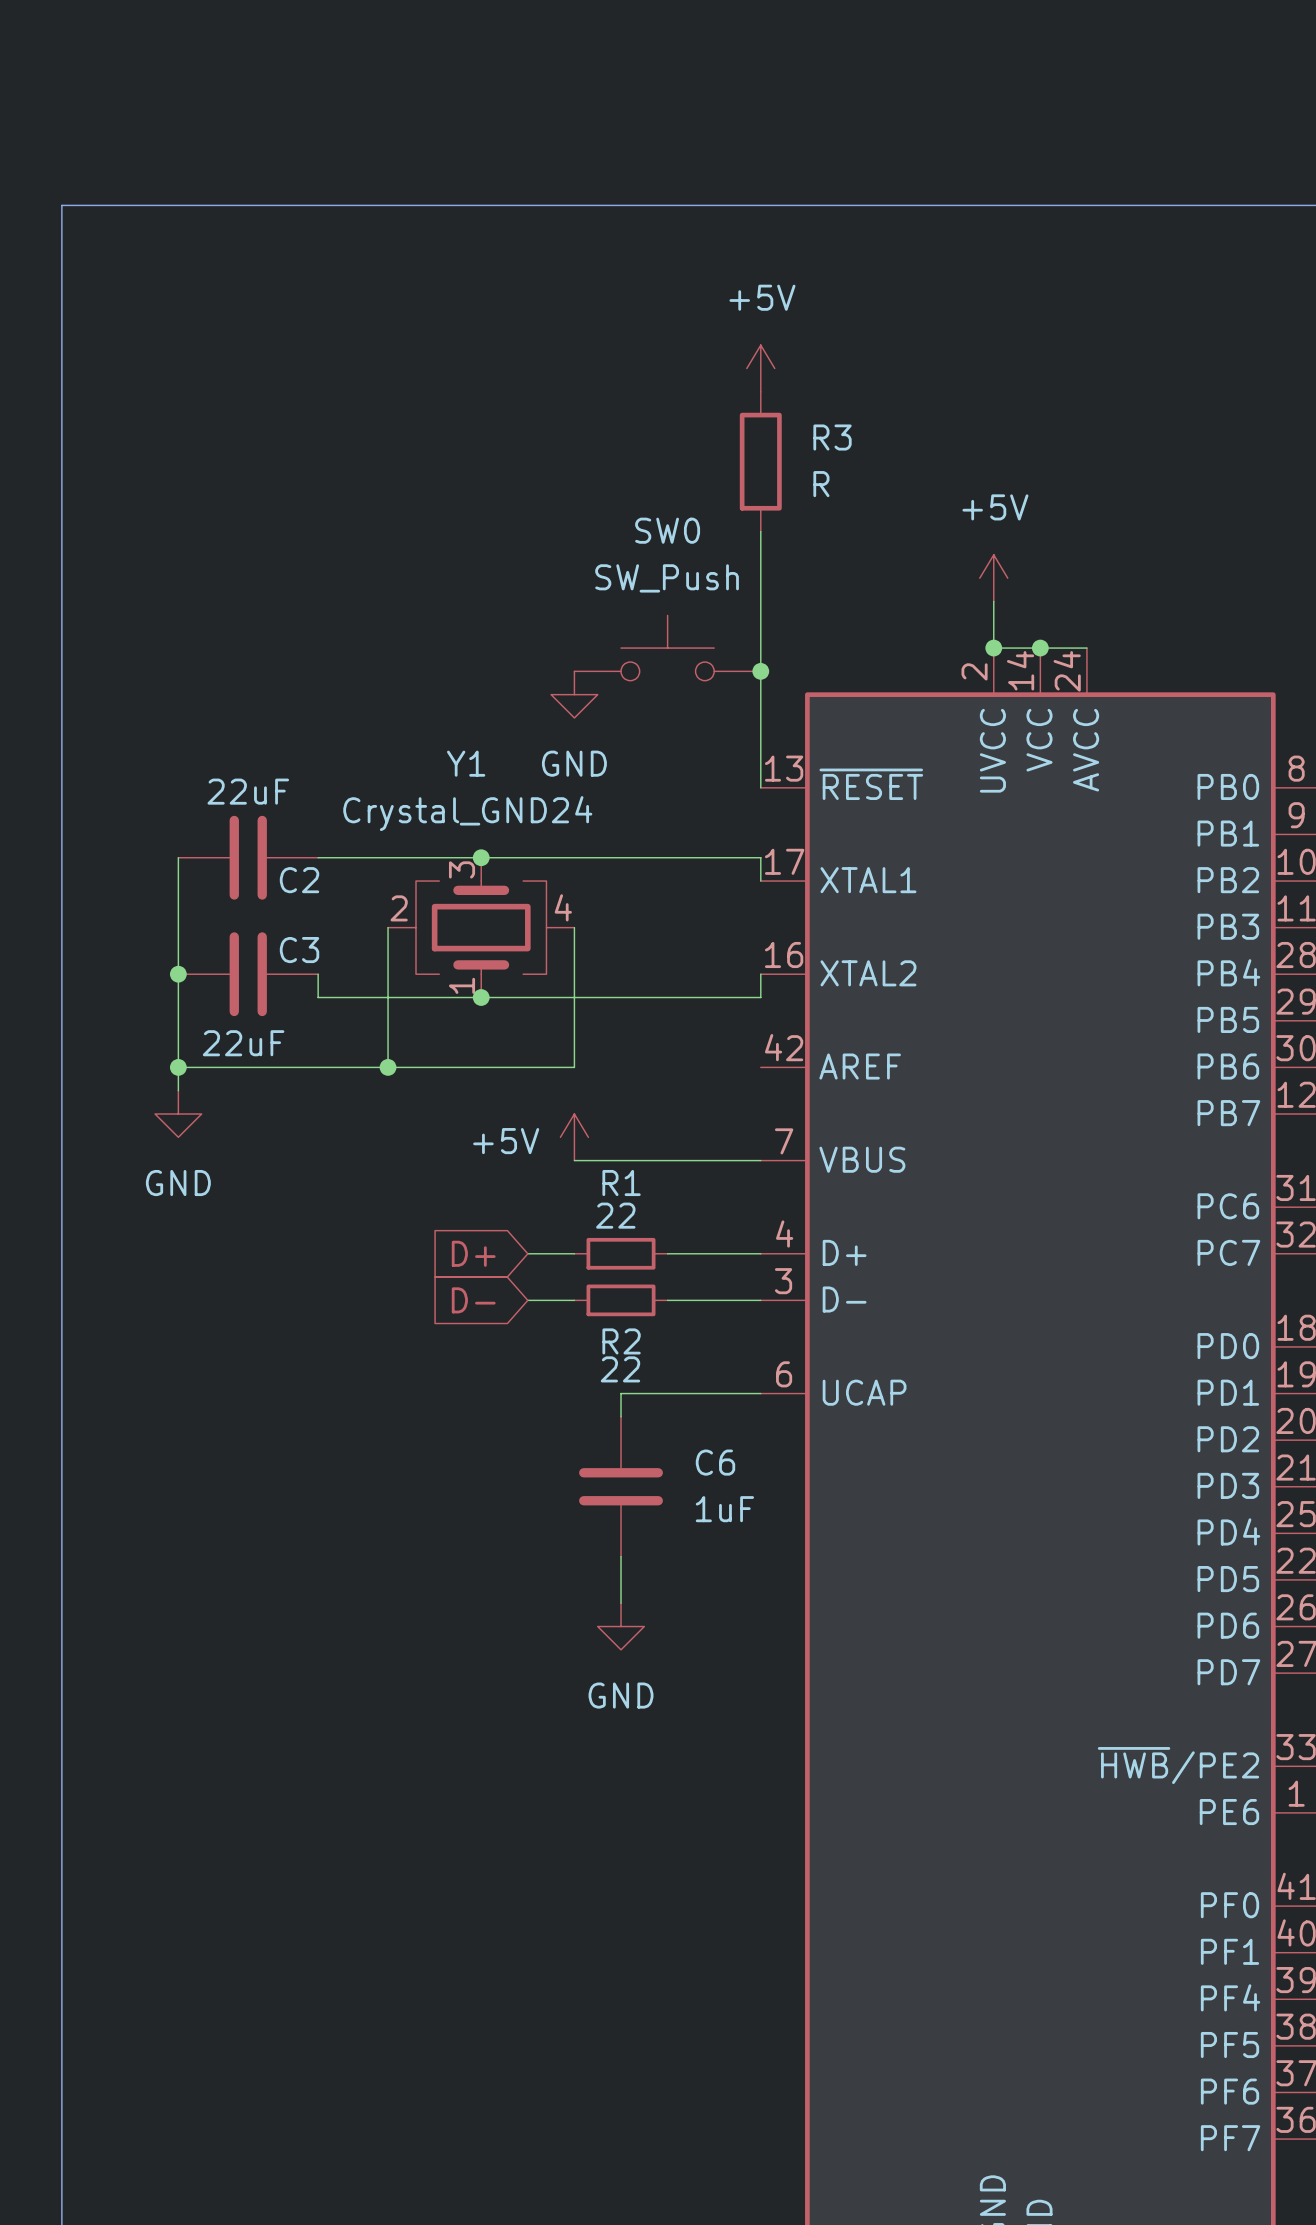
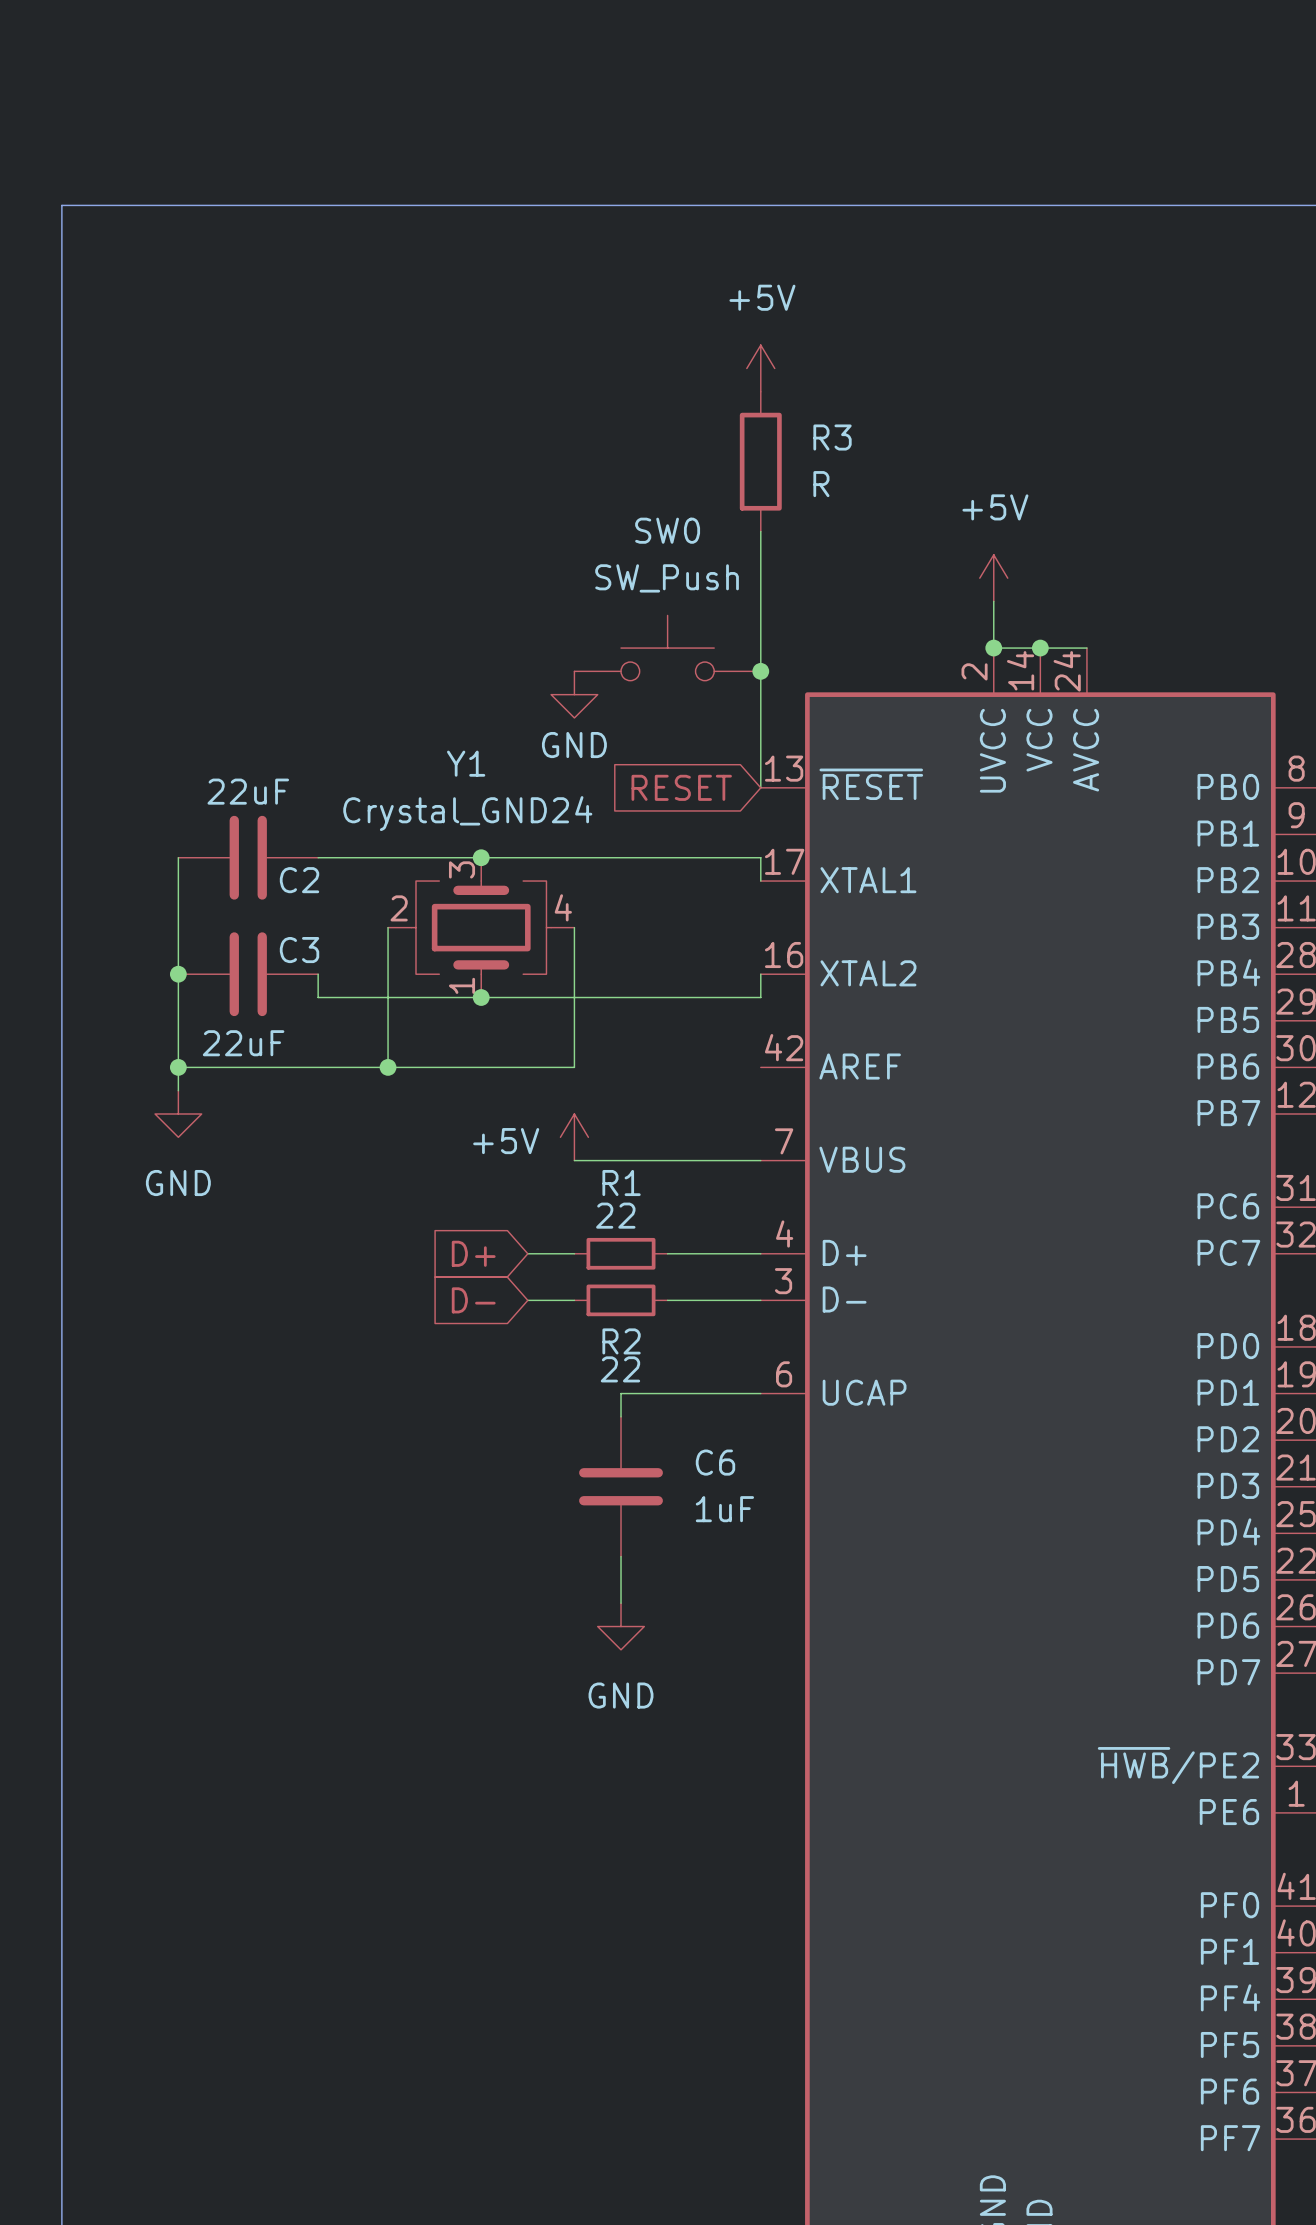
power symbol text position: GND (574, 763) -> GND (574, 745)
global label: none -> RESET (681, 787)

